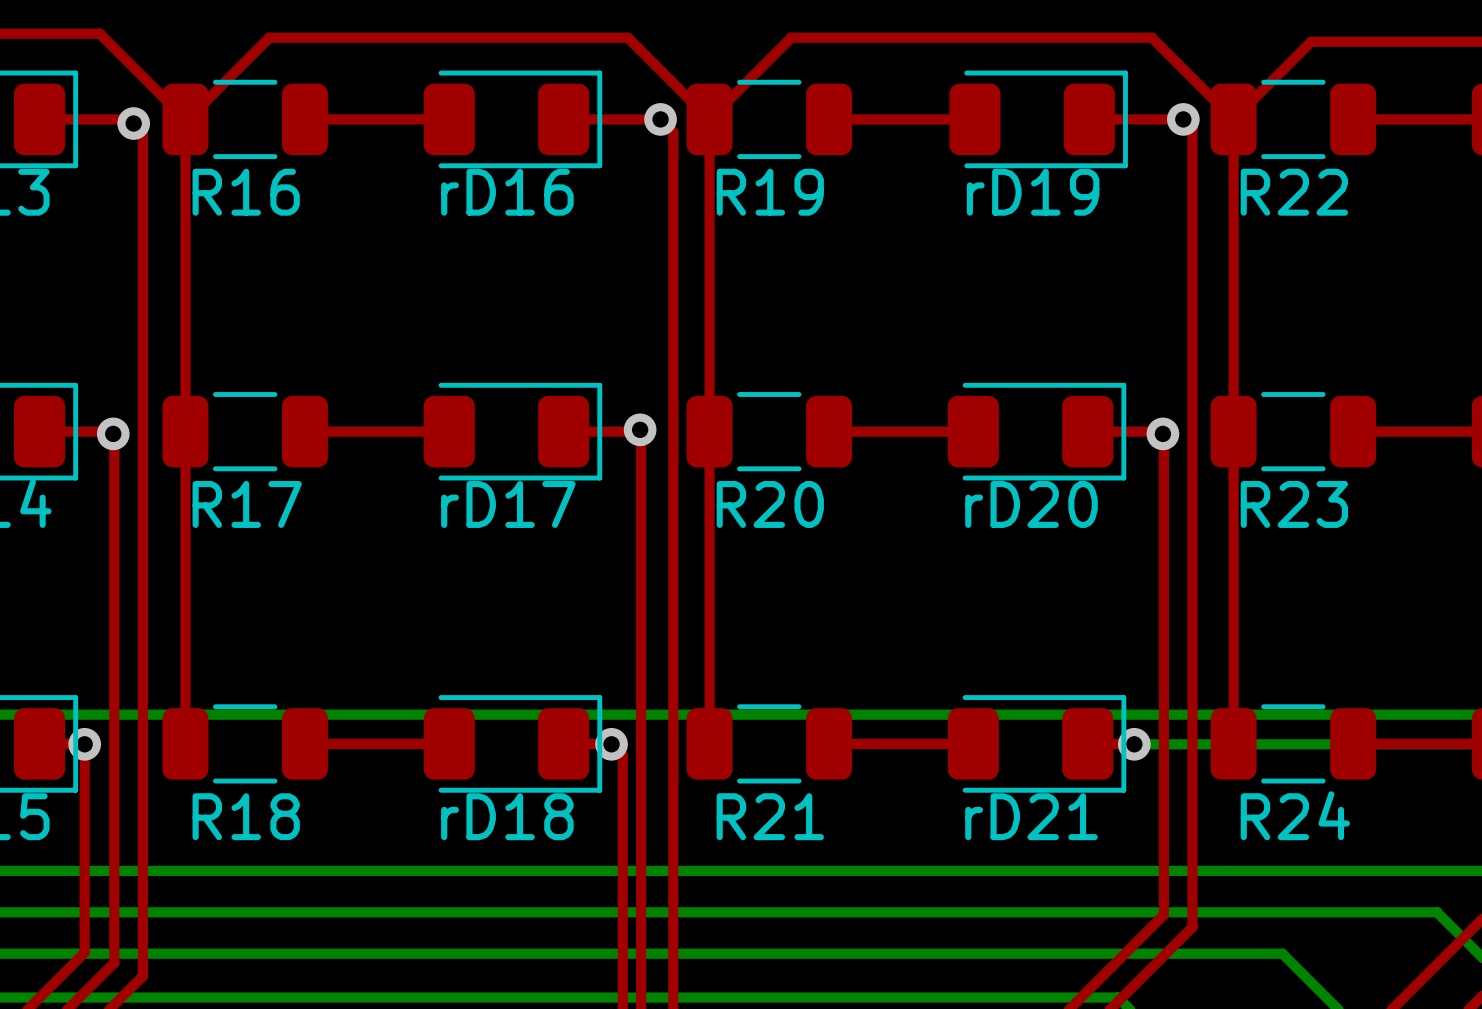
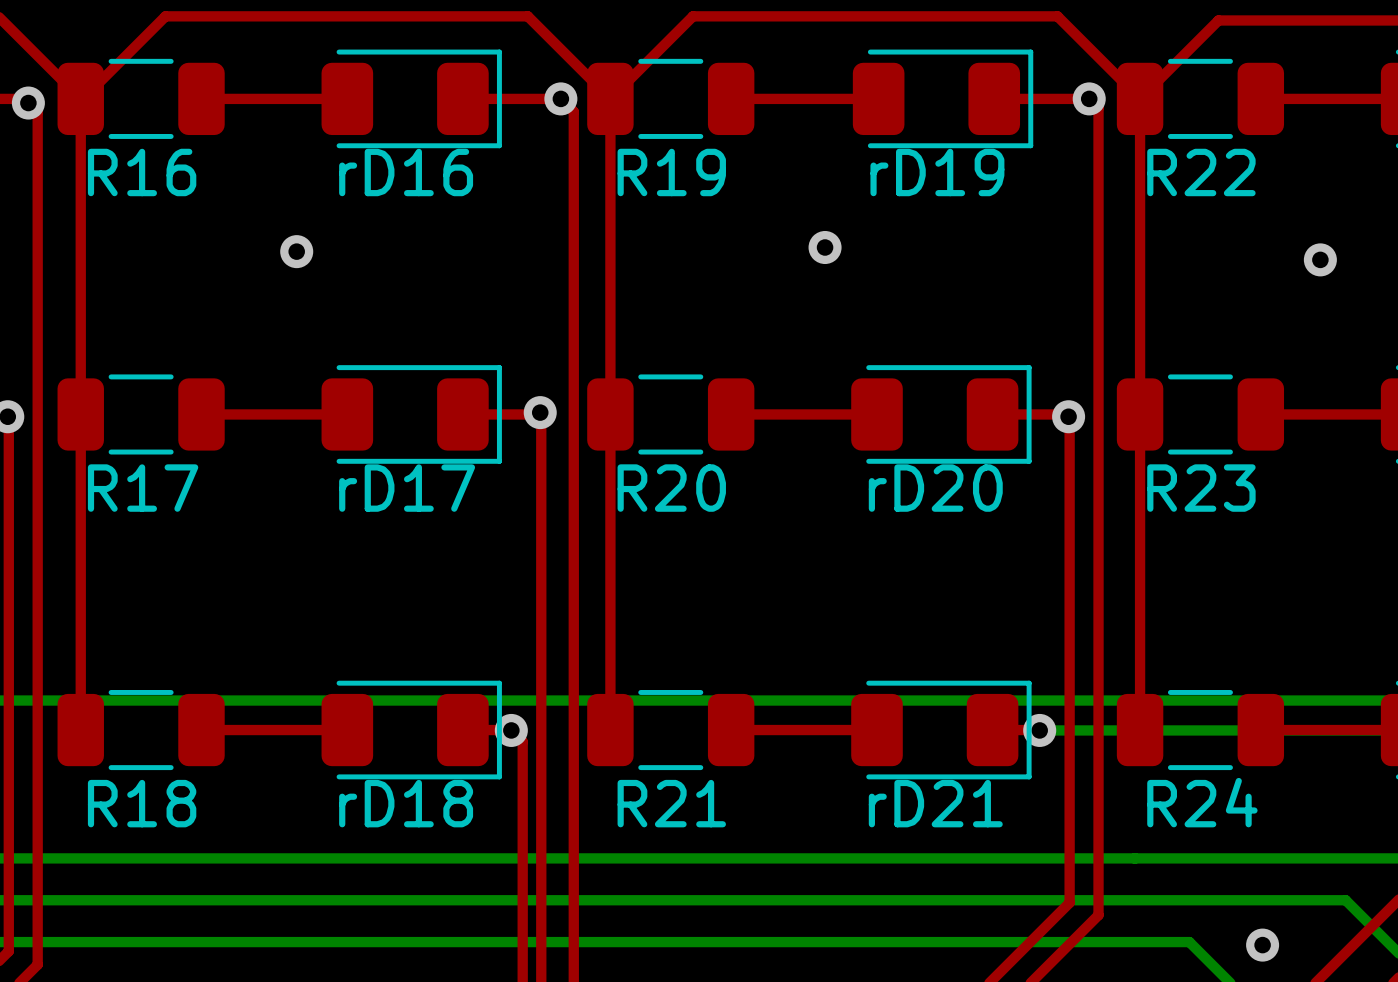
via: none -> (825, 247)
via: none -> (296, 251)
via: none -> (1320, 259)
via: none -> (1262, 945)

